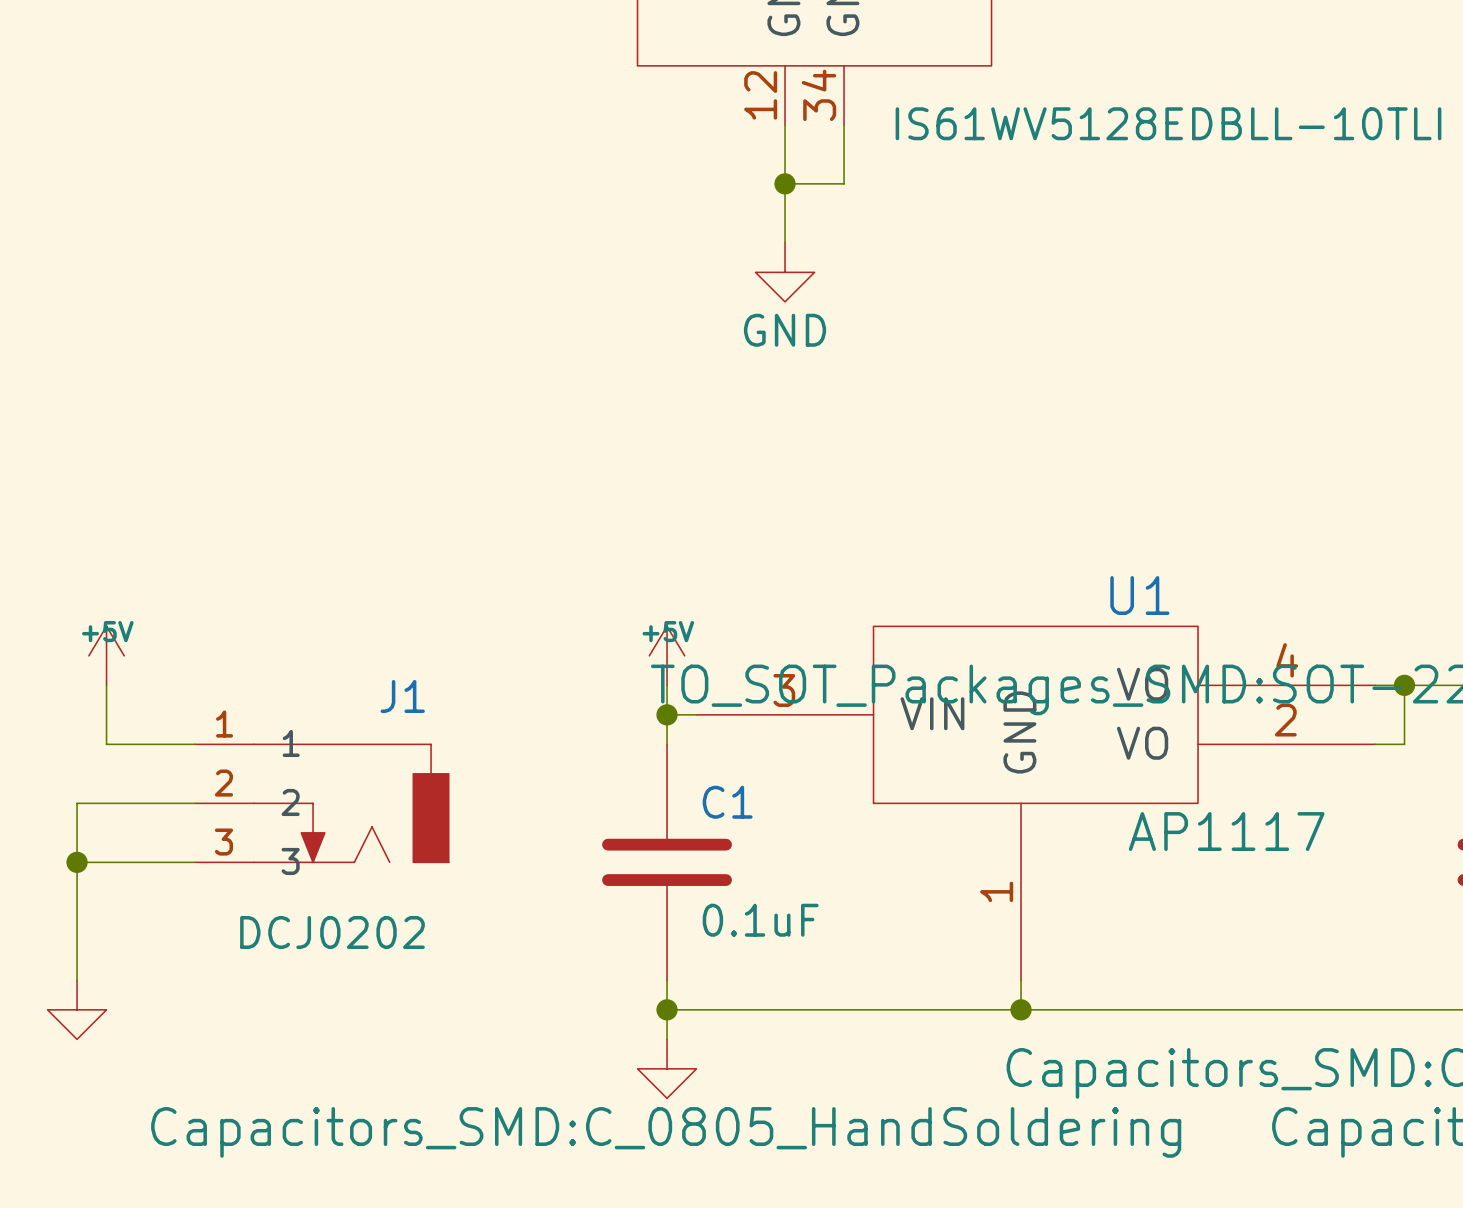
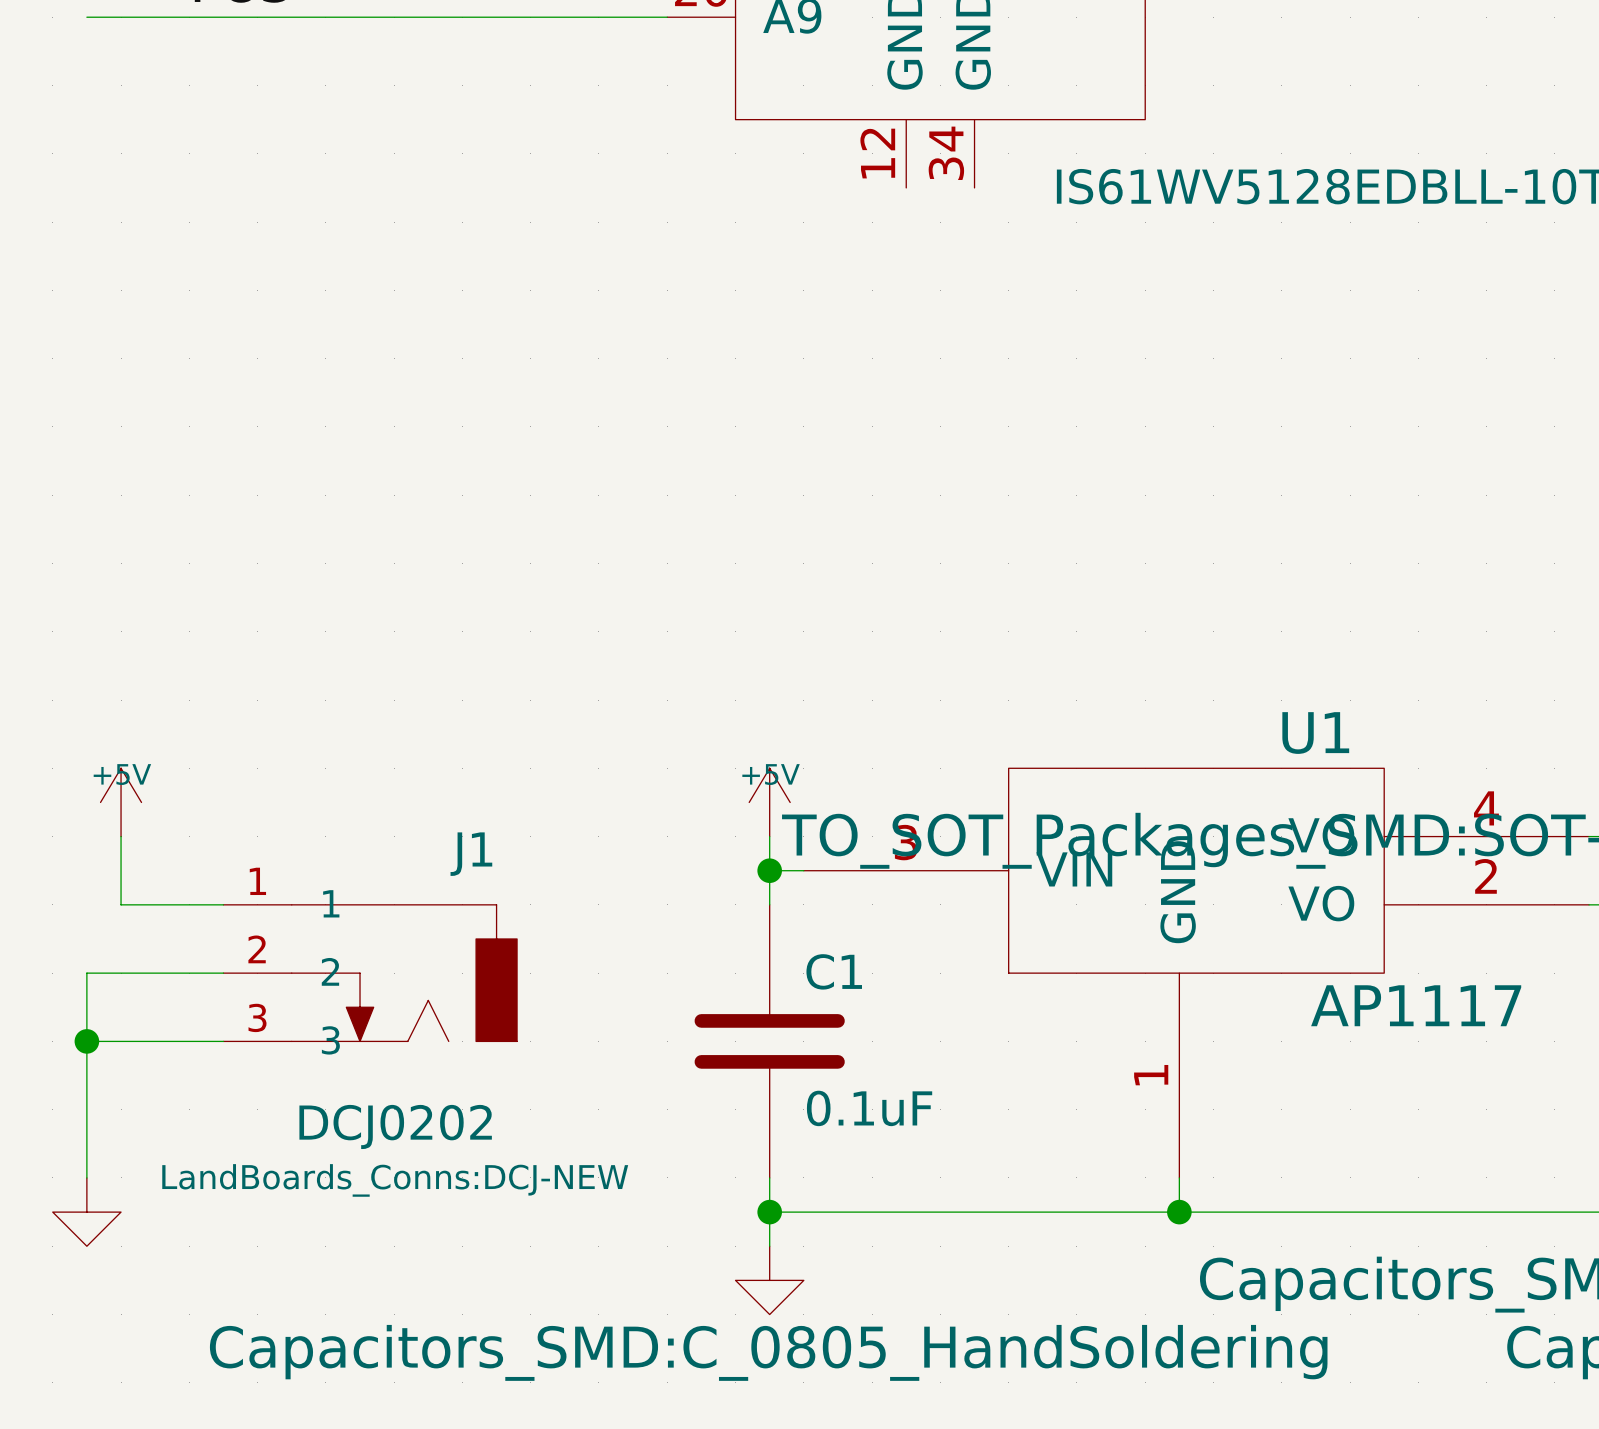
wire: (785, 124) (785, 242) -> none
wire: (844, 124) (844, 183) (785, 183) -> none
junction: (785, 183) -> none
power symbol: GND (785, 272) -> none
J1 text: none -> LandBoards_Conns:DCJ-NEW (395, 1180)

